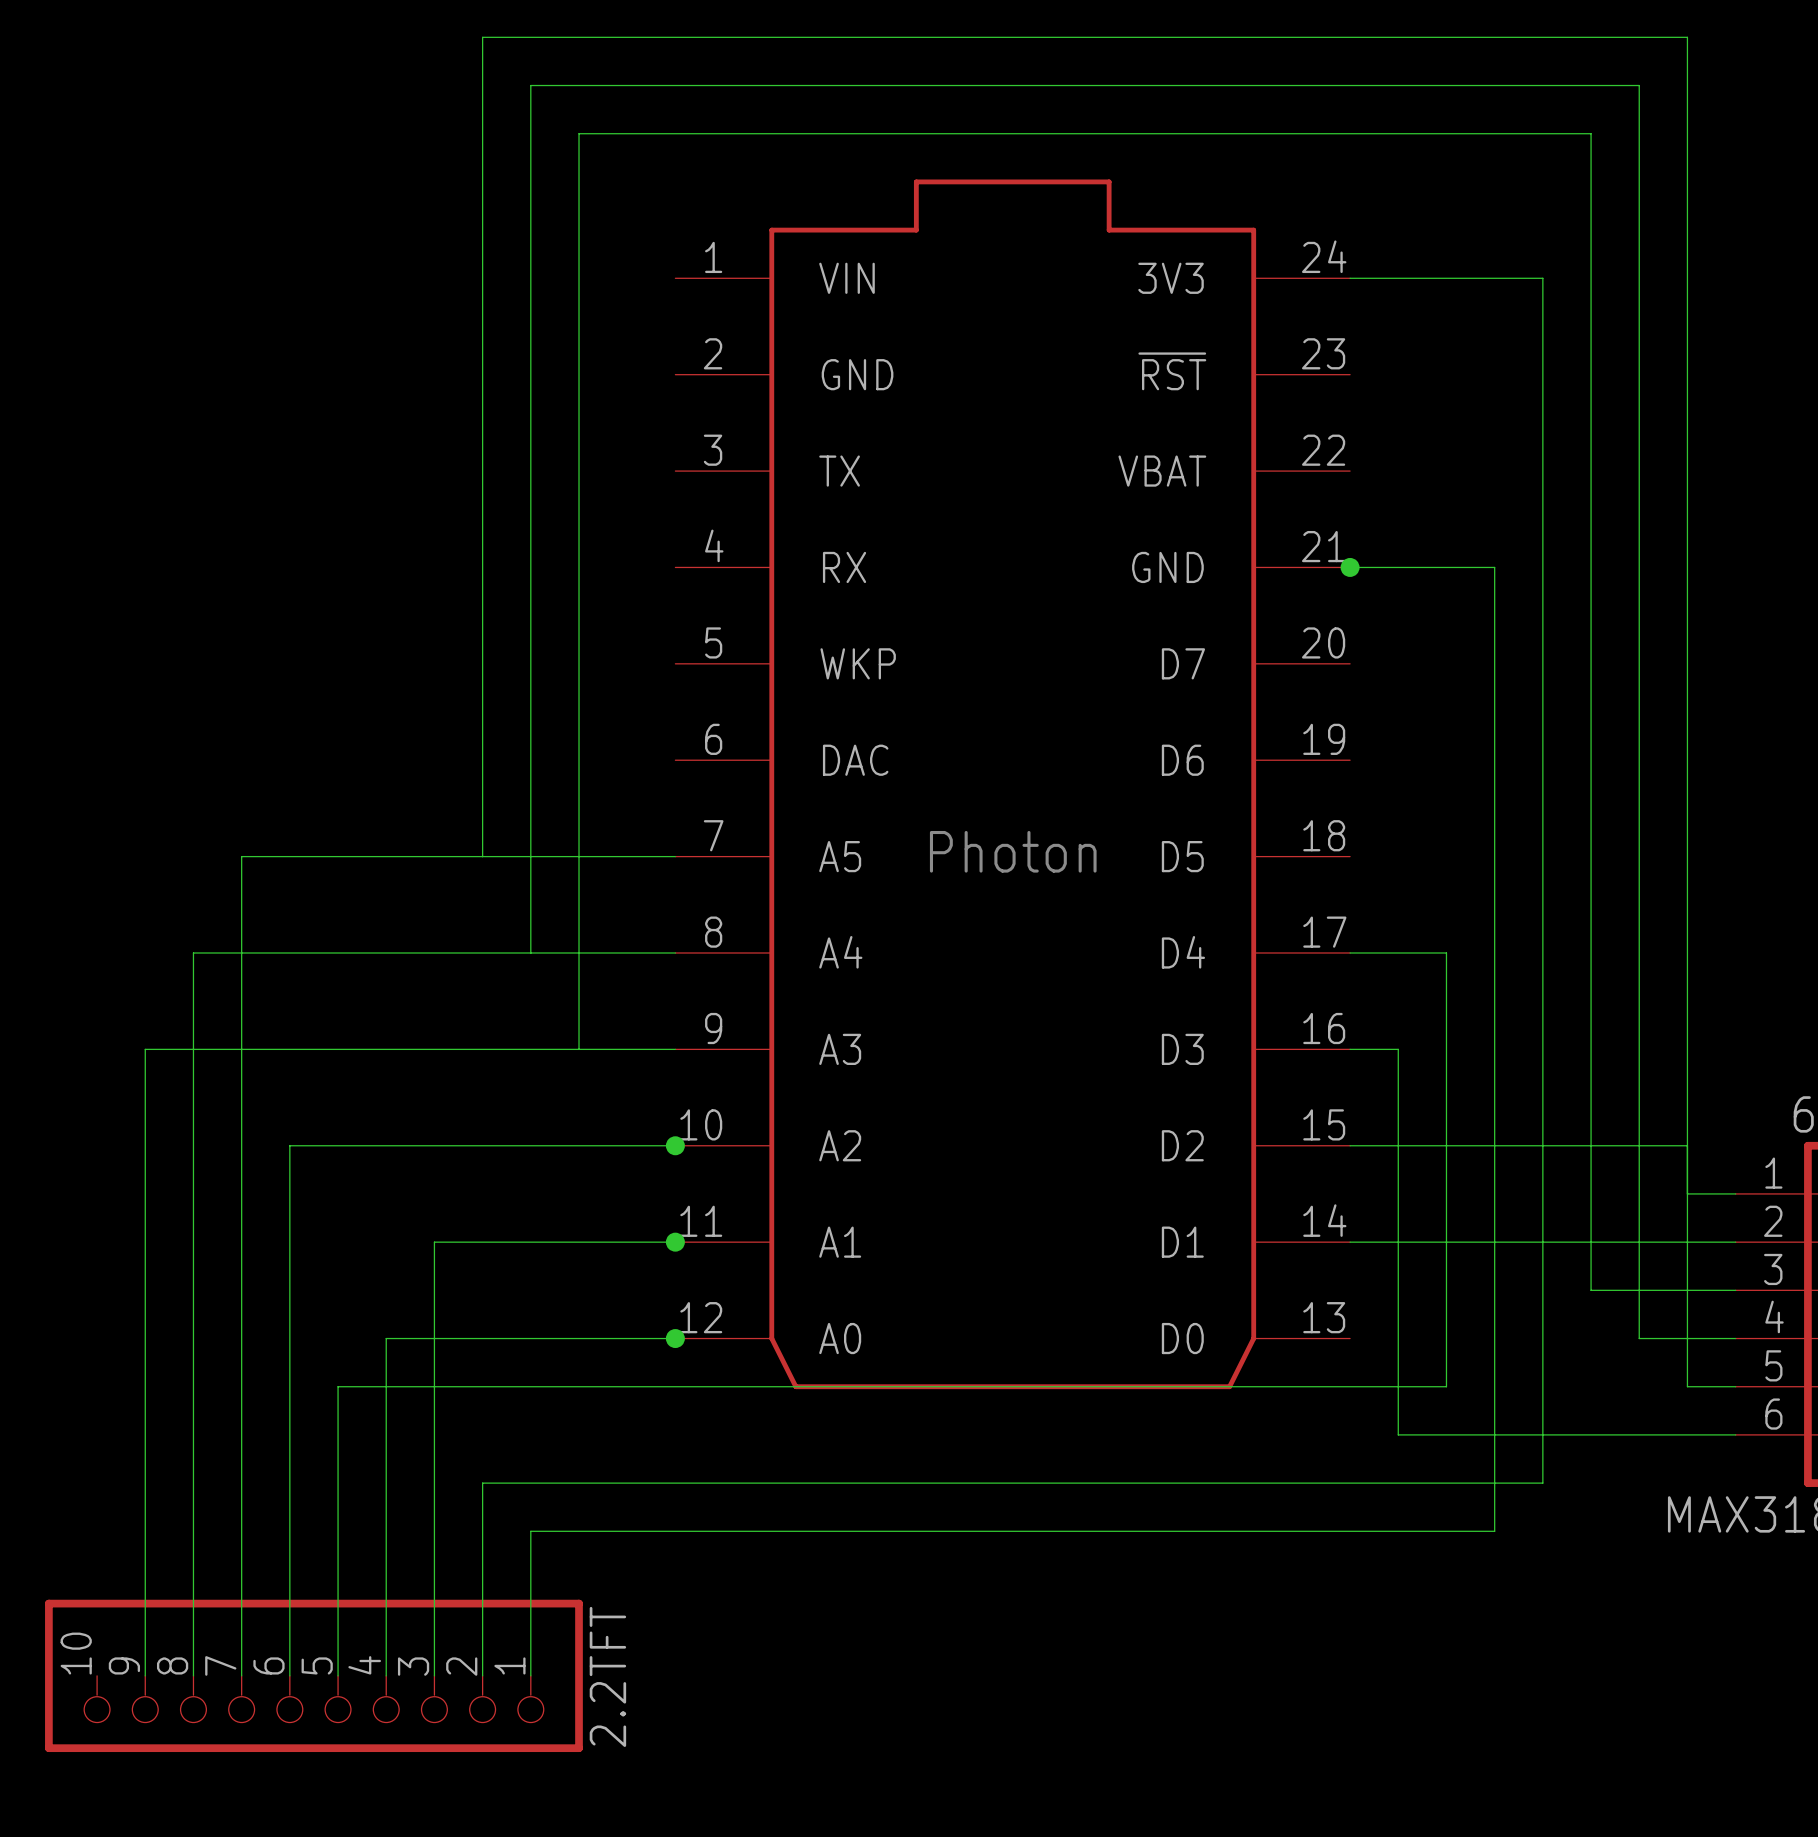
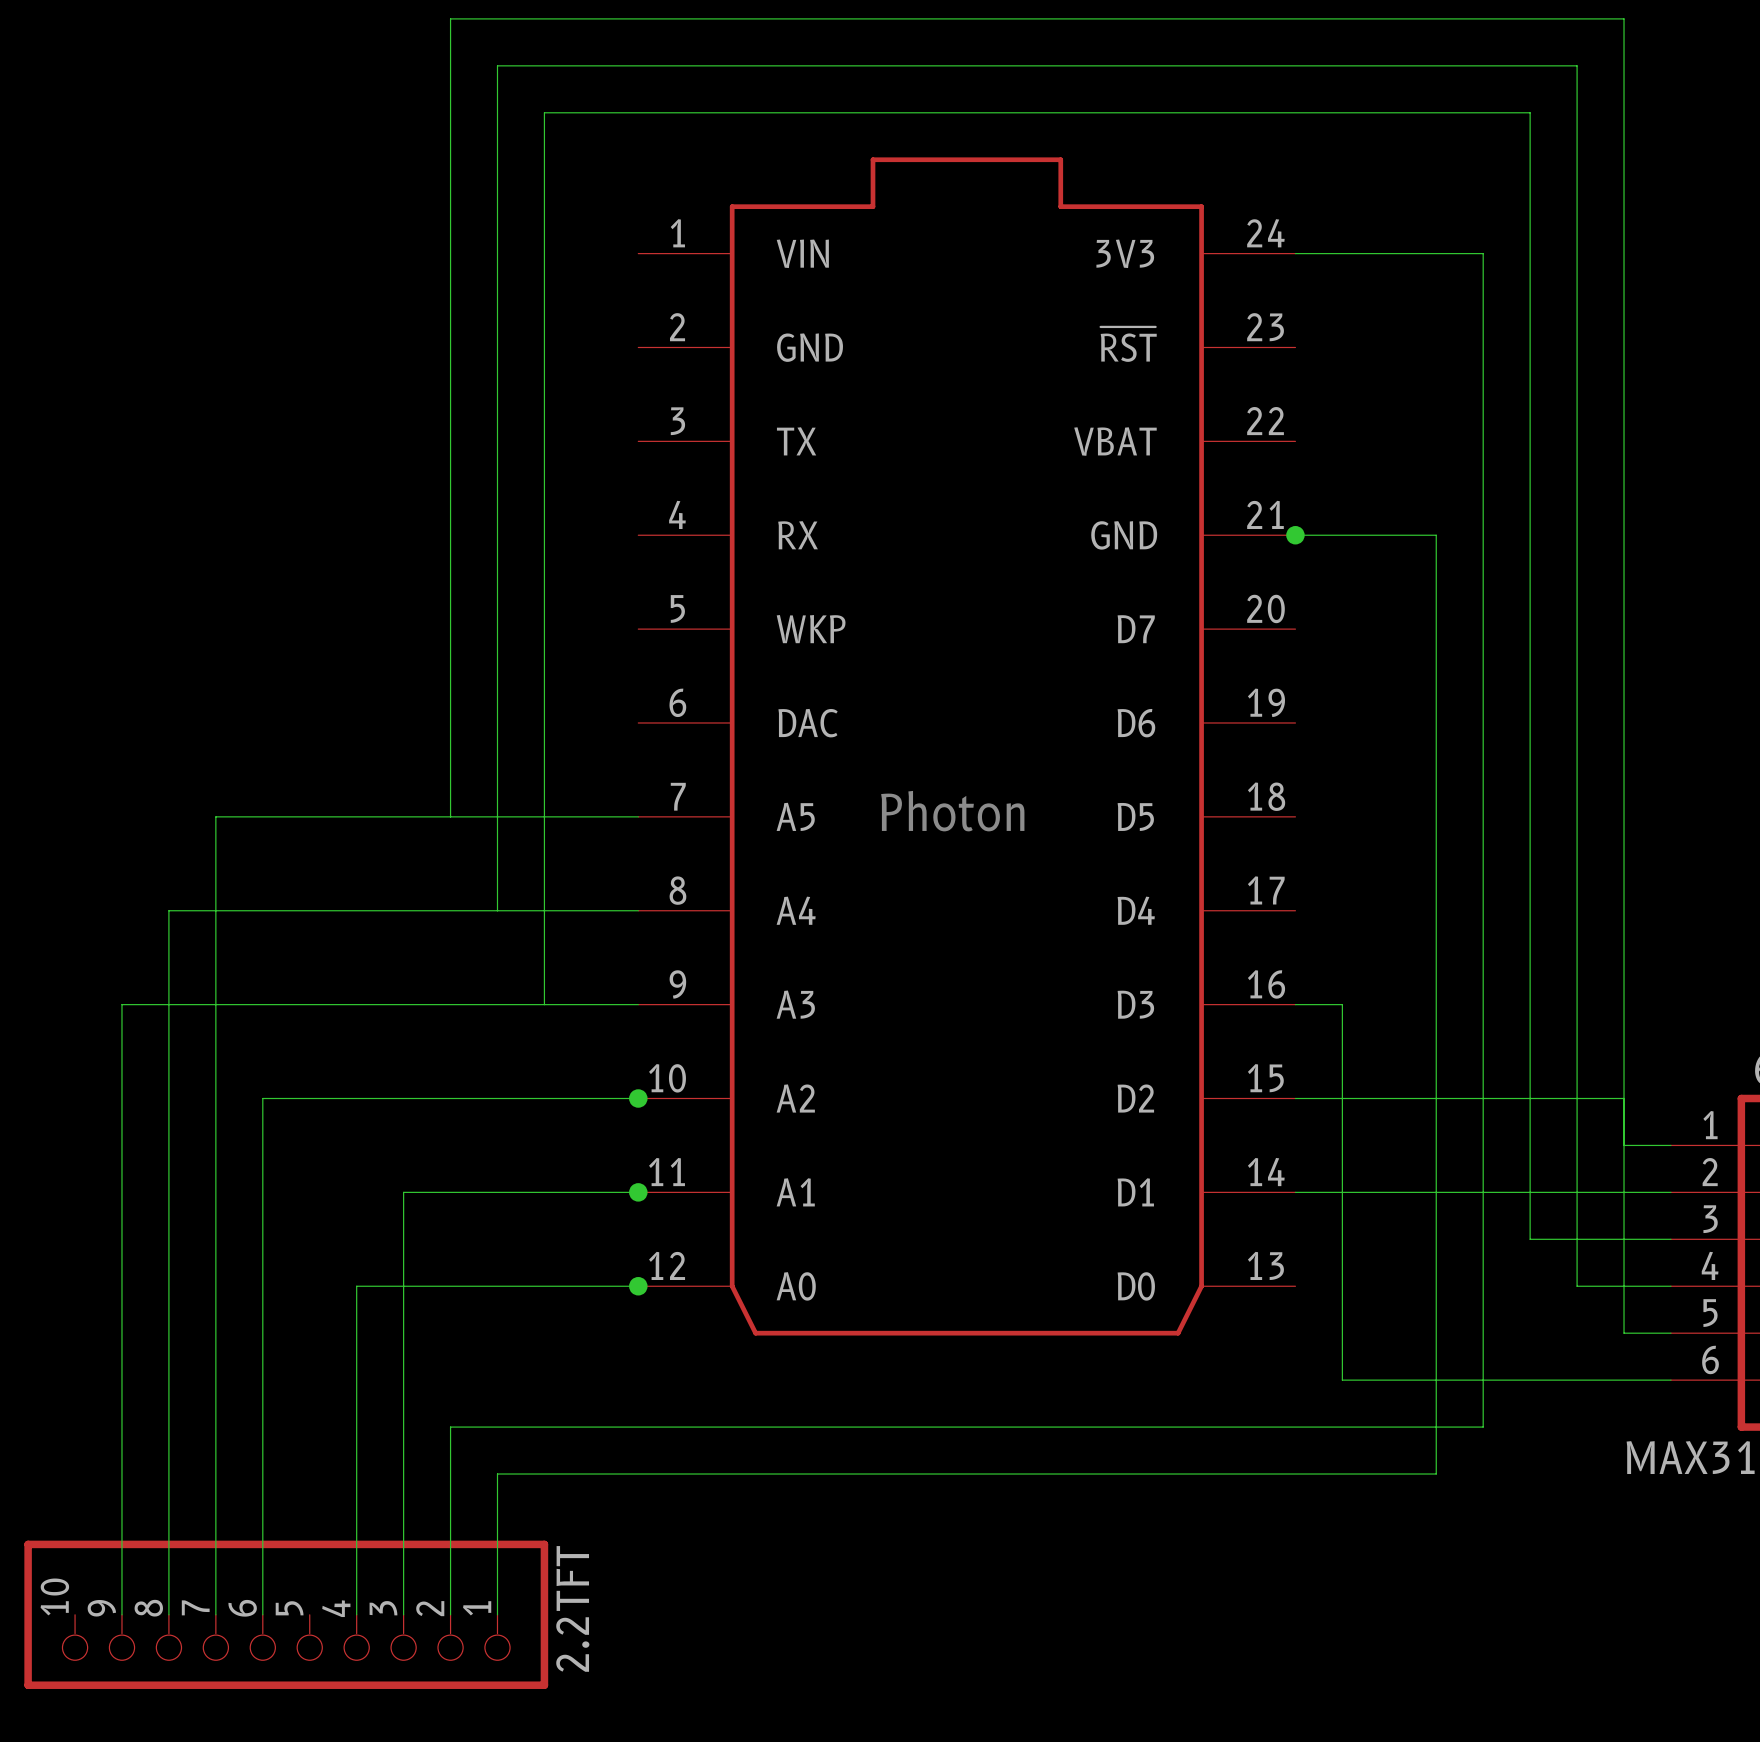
wire: (1350, 952) (1446, 952) (1446, 1386) (338, 1386) (338, 1675) -> none

